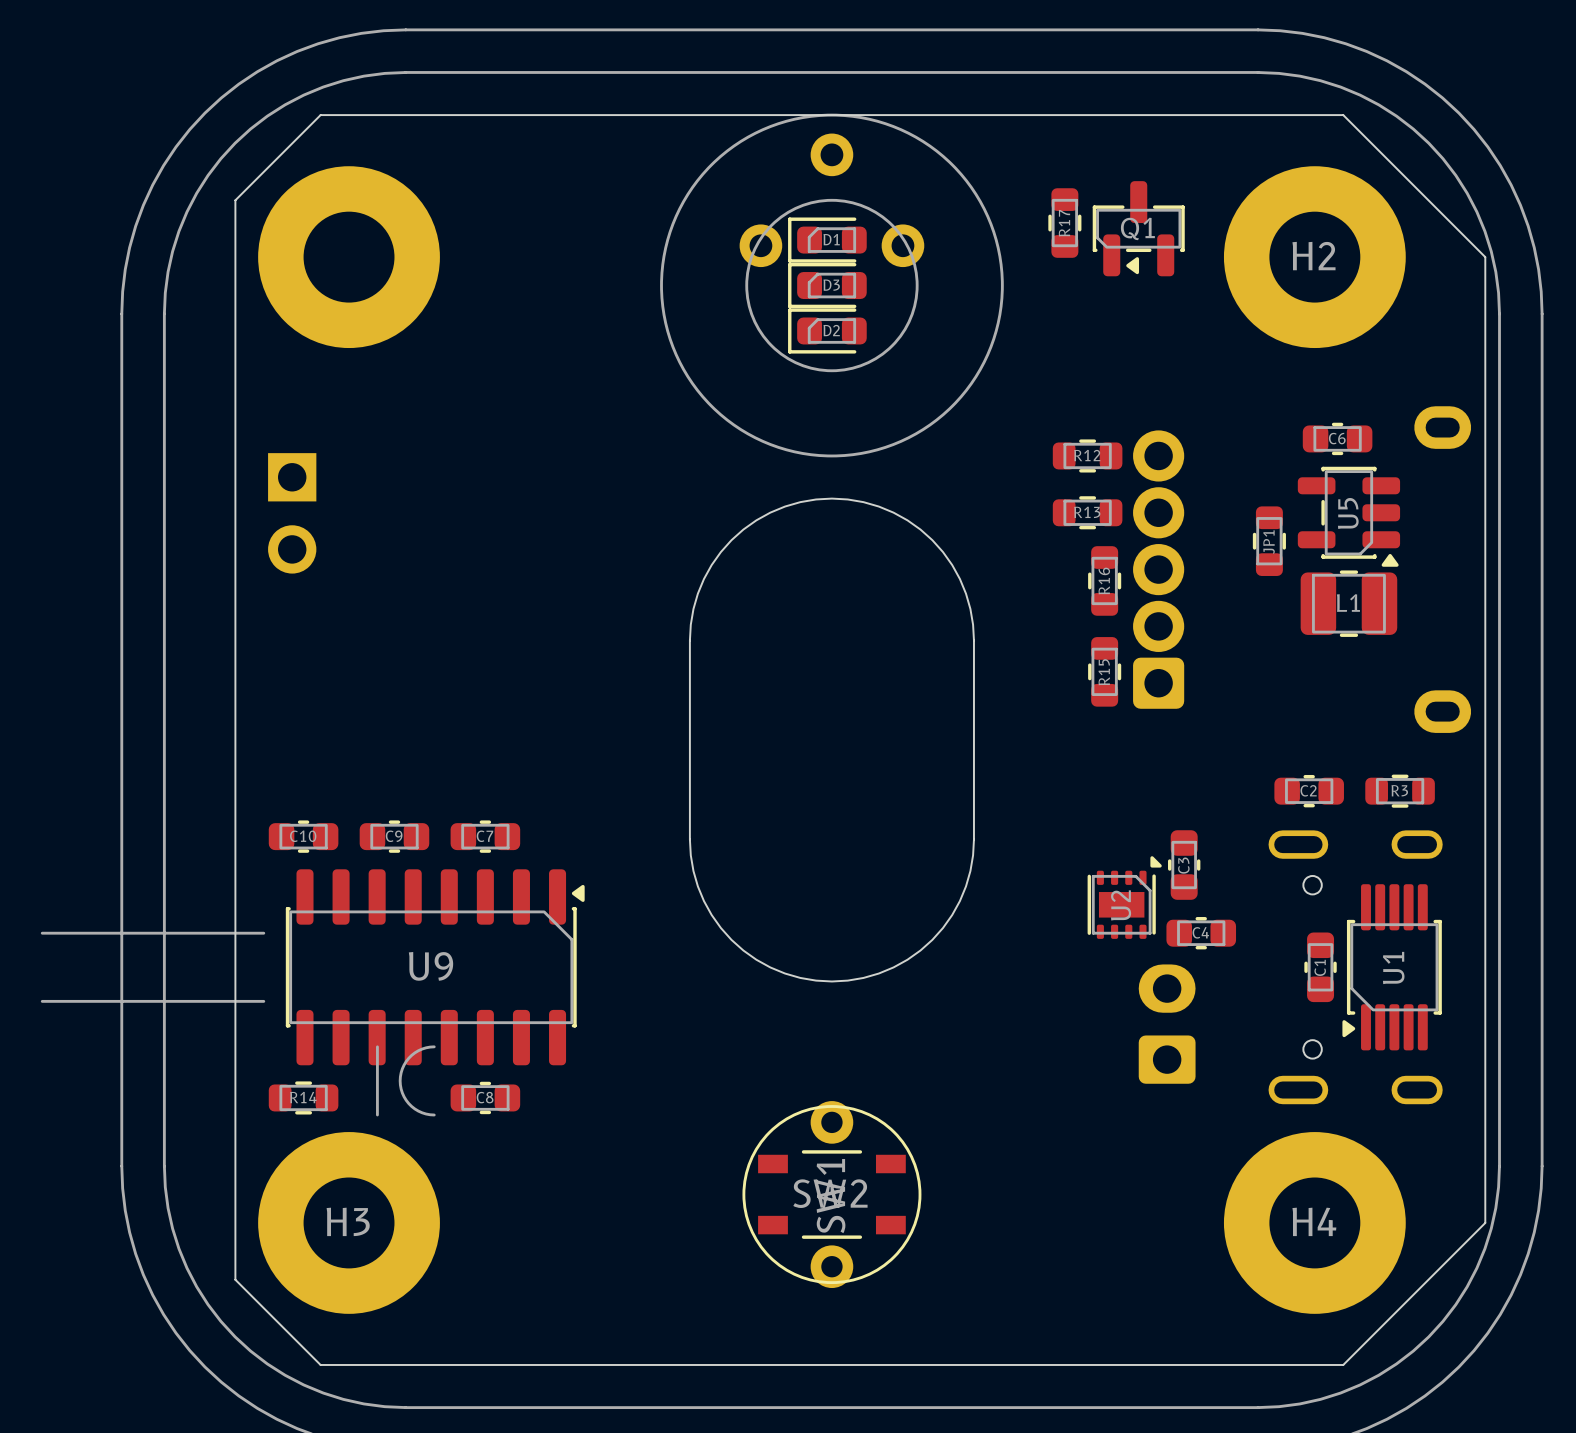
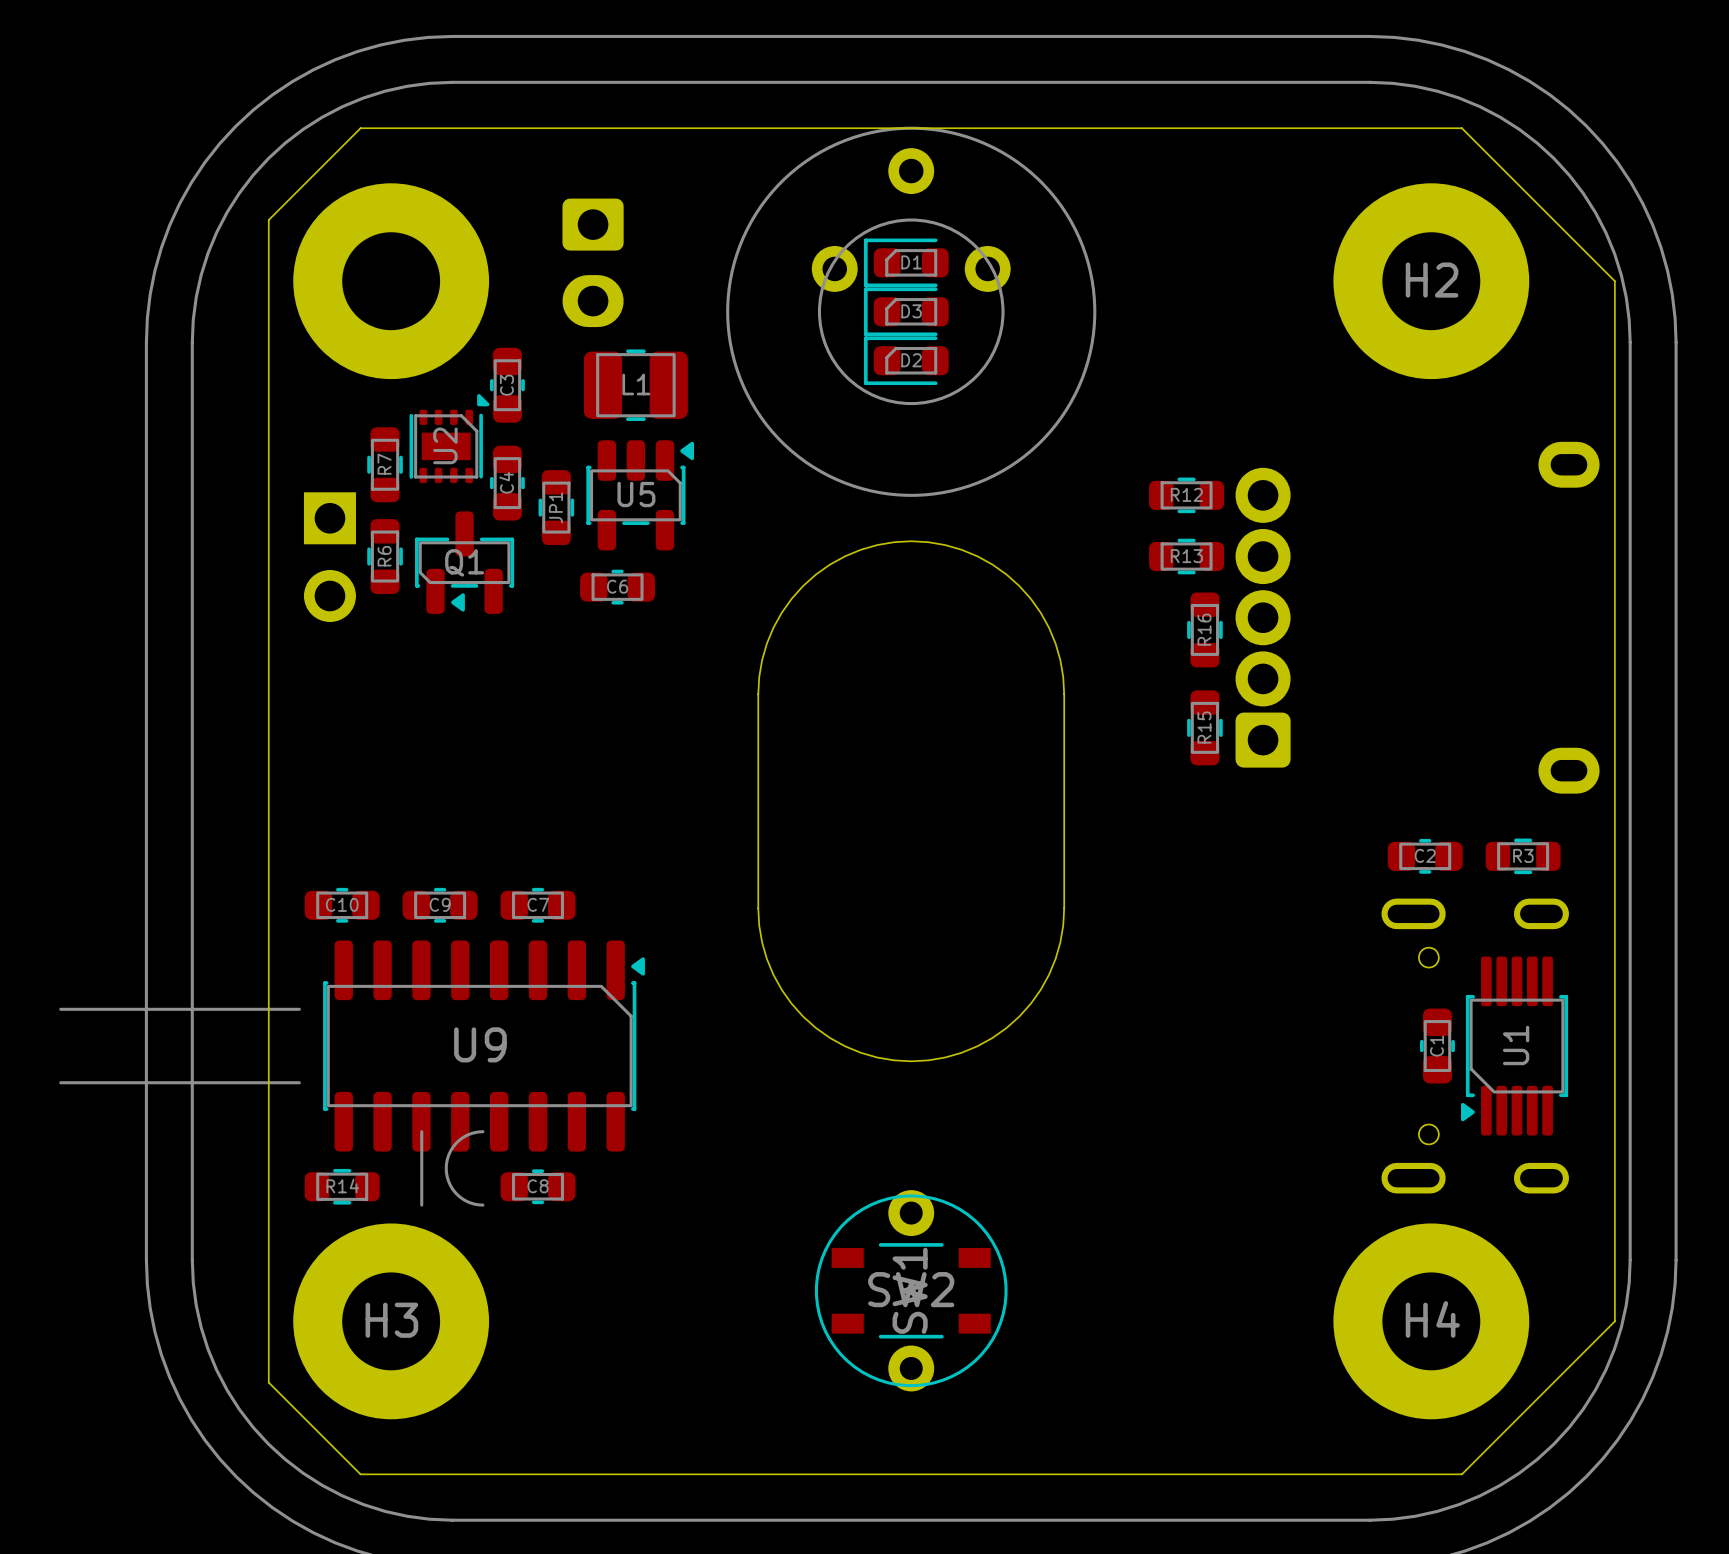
R17: (1064, 223) -> none
Q1 position: (1138, 228) -> (464, 562)
part: none -> (593, 262)
R7: none -> (385, 464)
C6 position: (1337, 438) -> (617, 587)
R6: none -> (385, 556)
U5 rotation: 0° (1348, 516) -> 90° counterclockwise (640, 495)
U5 position: (1348, 516) -> (640, 495)
JP1 position: (1269, 541) -> (556, 507)
L1 position: (1348, 603) -> (635, 385)
C3 position: (1184, 865) -> (507, 385)
U2 position: (1124, 897) -> (449, 438)
C4 rotation: 0° (1201, 933) -> 90° clockwise (507, 483)
C4 position: (1201, 933) -> (507, 483)
part: (1167, 1024) -> none

